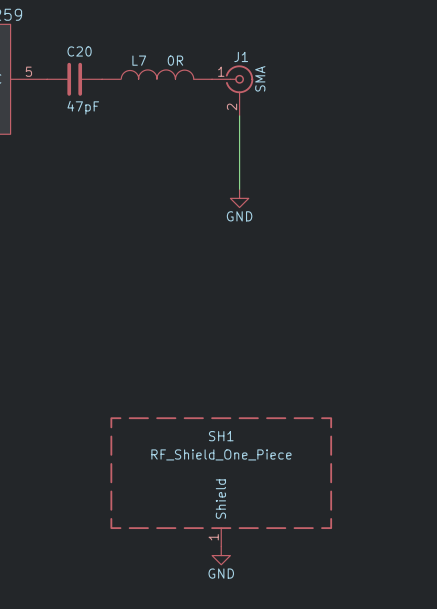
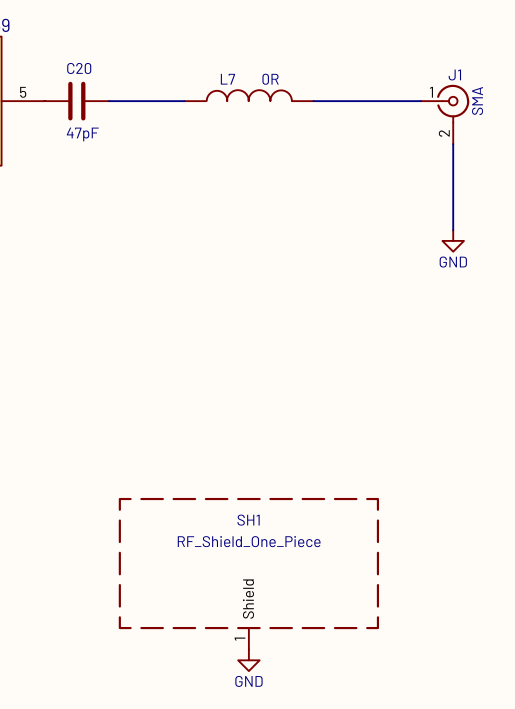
L7 position: (157, 74) -> (248, 95)
wire: none -> (109, 101) (184, 101)
wire: none -> (313, 101) (420, 101)
J1 position: (232, 90) -> (445, 114)
wire: (239, 115) (239, 189) -> (453, 144) (453, 230)
power symbol position: GND (239, 198) -> GND (453, 240)

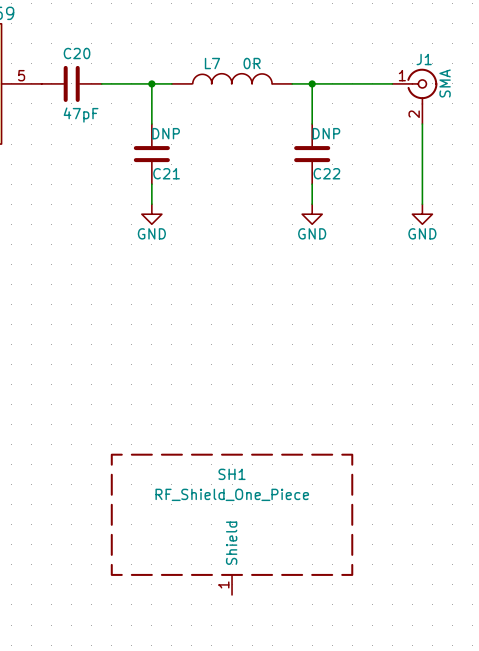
wire: none -> (151, 83) (151, 124)
junction: none -> (151, 83)
wire: none -> (312, 83) (312, 124)
junction: none -> (312, 83)
C21: none -> DNP (151, 154)
C22: none -> DNP (312, 154)
wire: none -> (151, 184) (151, 204)
wire: none -> (312, 184) (312, 204)
power symbol: none -> GND (151, 214)
power symbol: none -> GND (312, 214)
power symbol: GND (248, 660) -> none

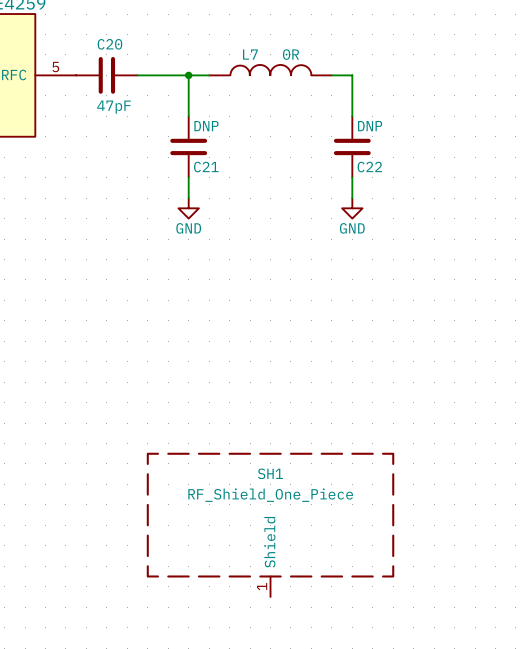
wire: (312, 83) (392, 83) -> none
junction: (312, 83) -> none
J1: SMA (414, 96) -> none
wire: (422, 124) (422, 204) -> none
power symbol: GND (422, 214) -> none

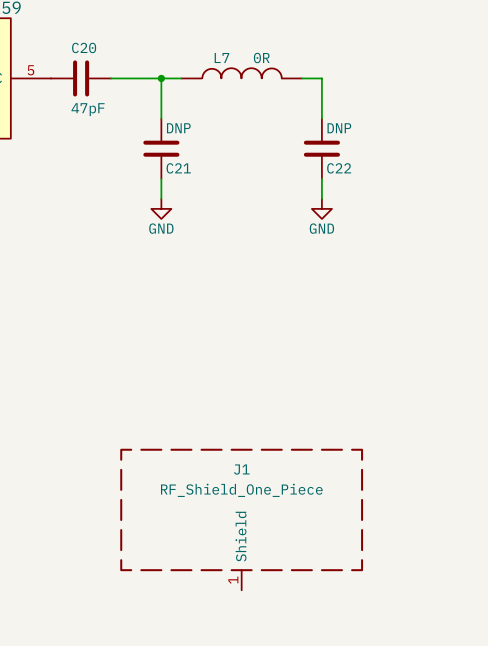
SH1 name: SH1 (270, 473) -> J1 (241, 469)

